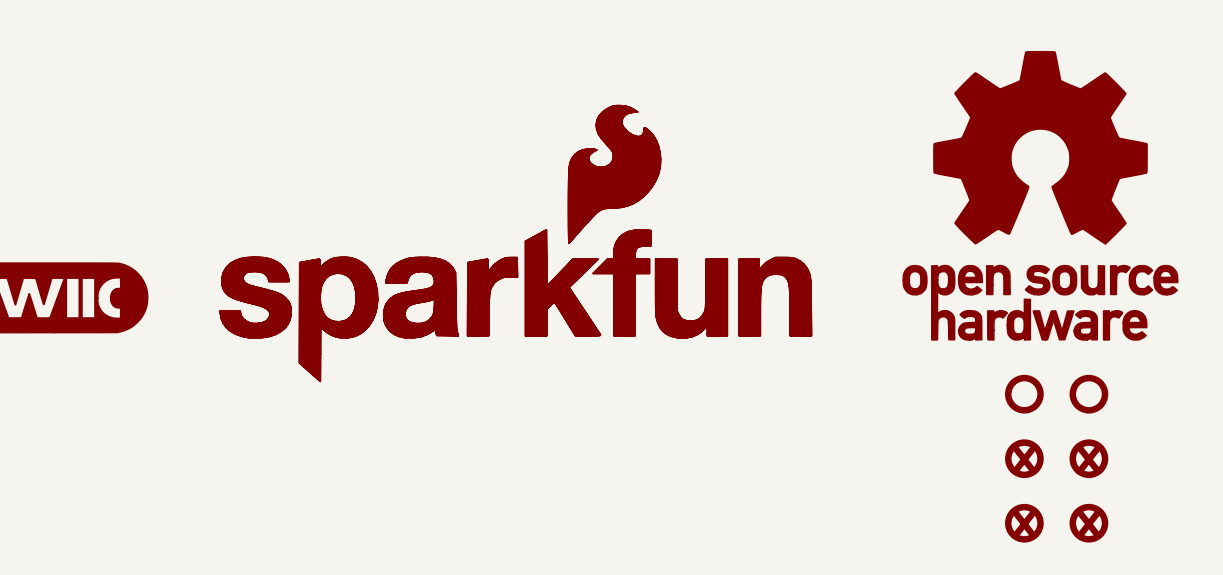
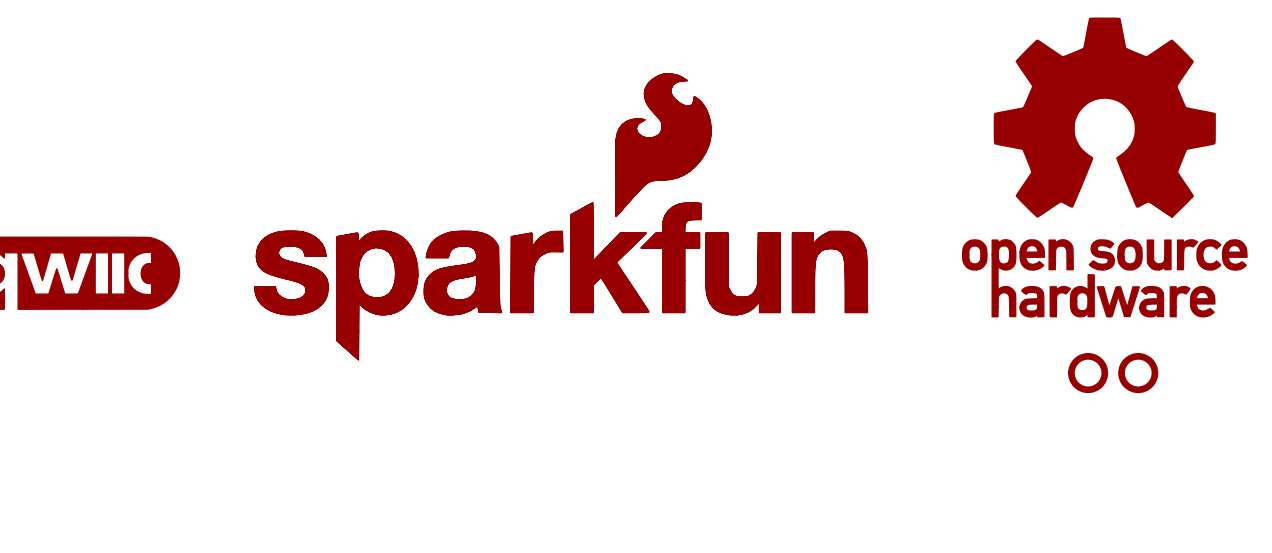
part position: (1088, 394) -> (1138, 373)
part: (1024, 458) -> none
part: (1088, 458) -> none
part: (1024, 523) -> none
part: (1088, 523) -> none

